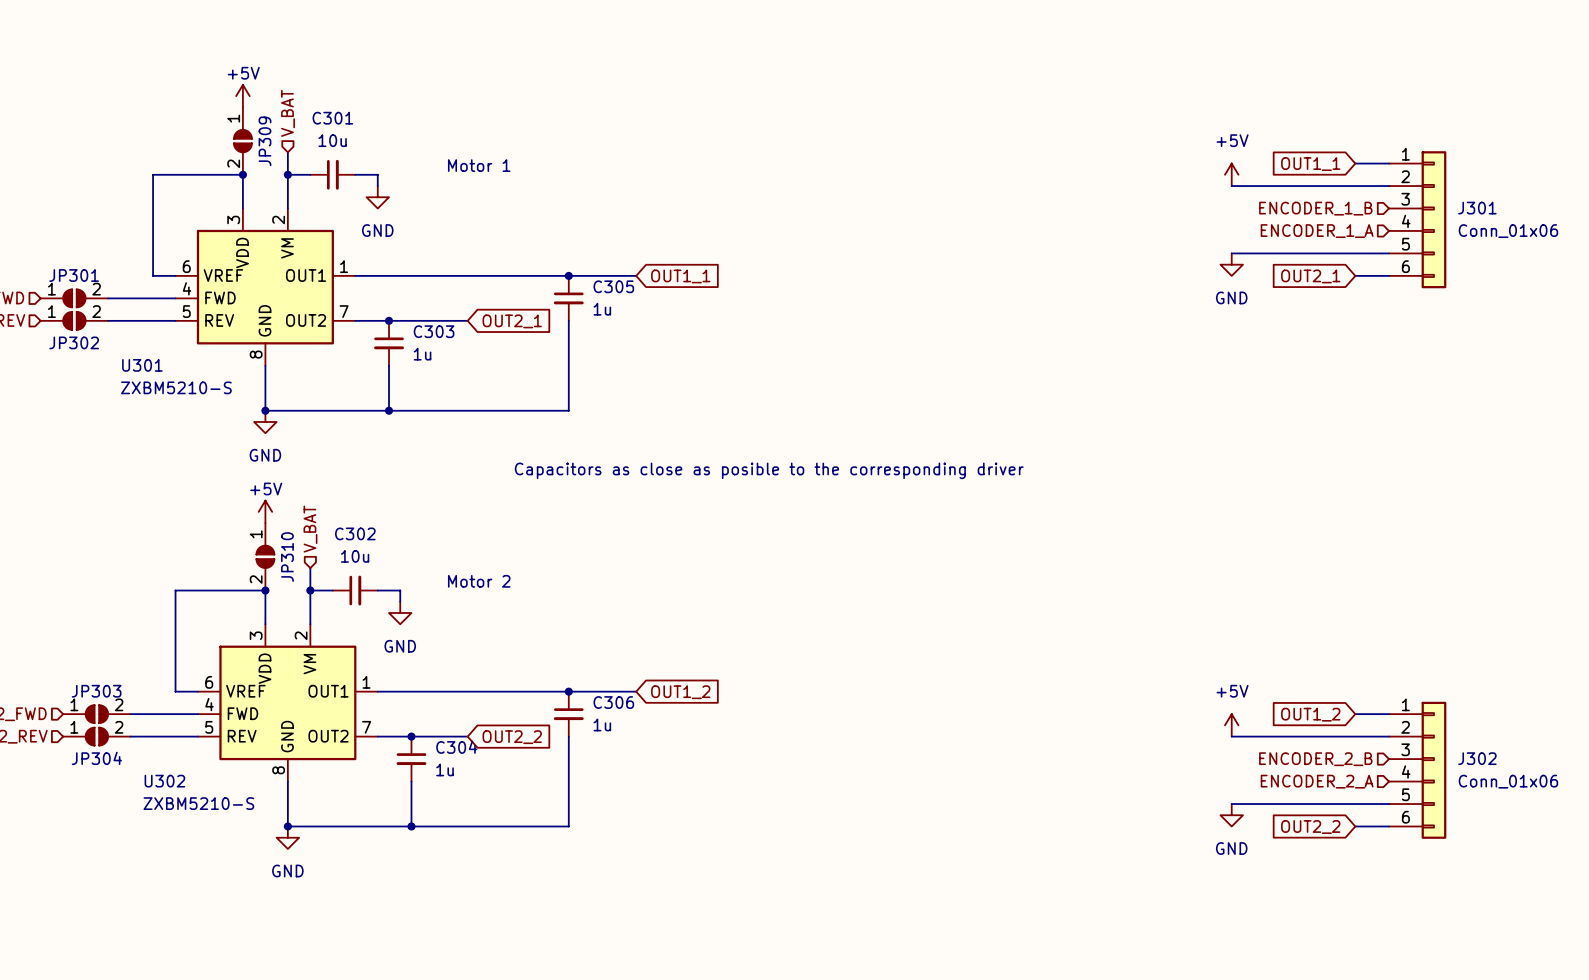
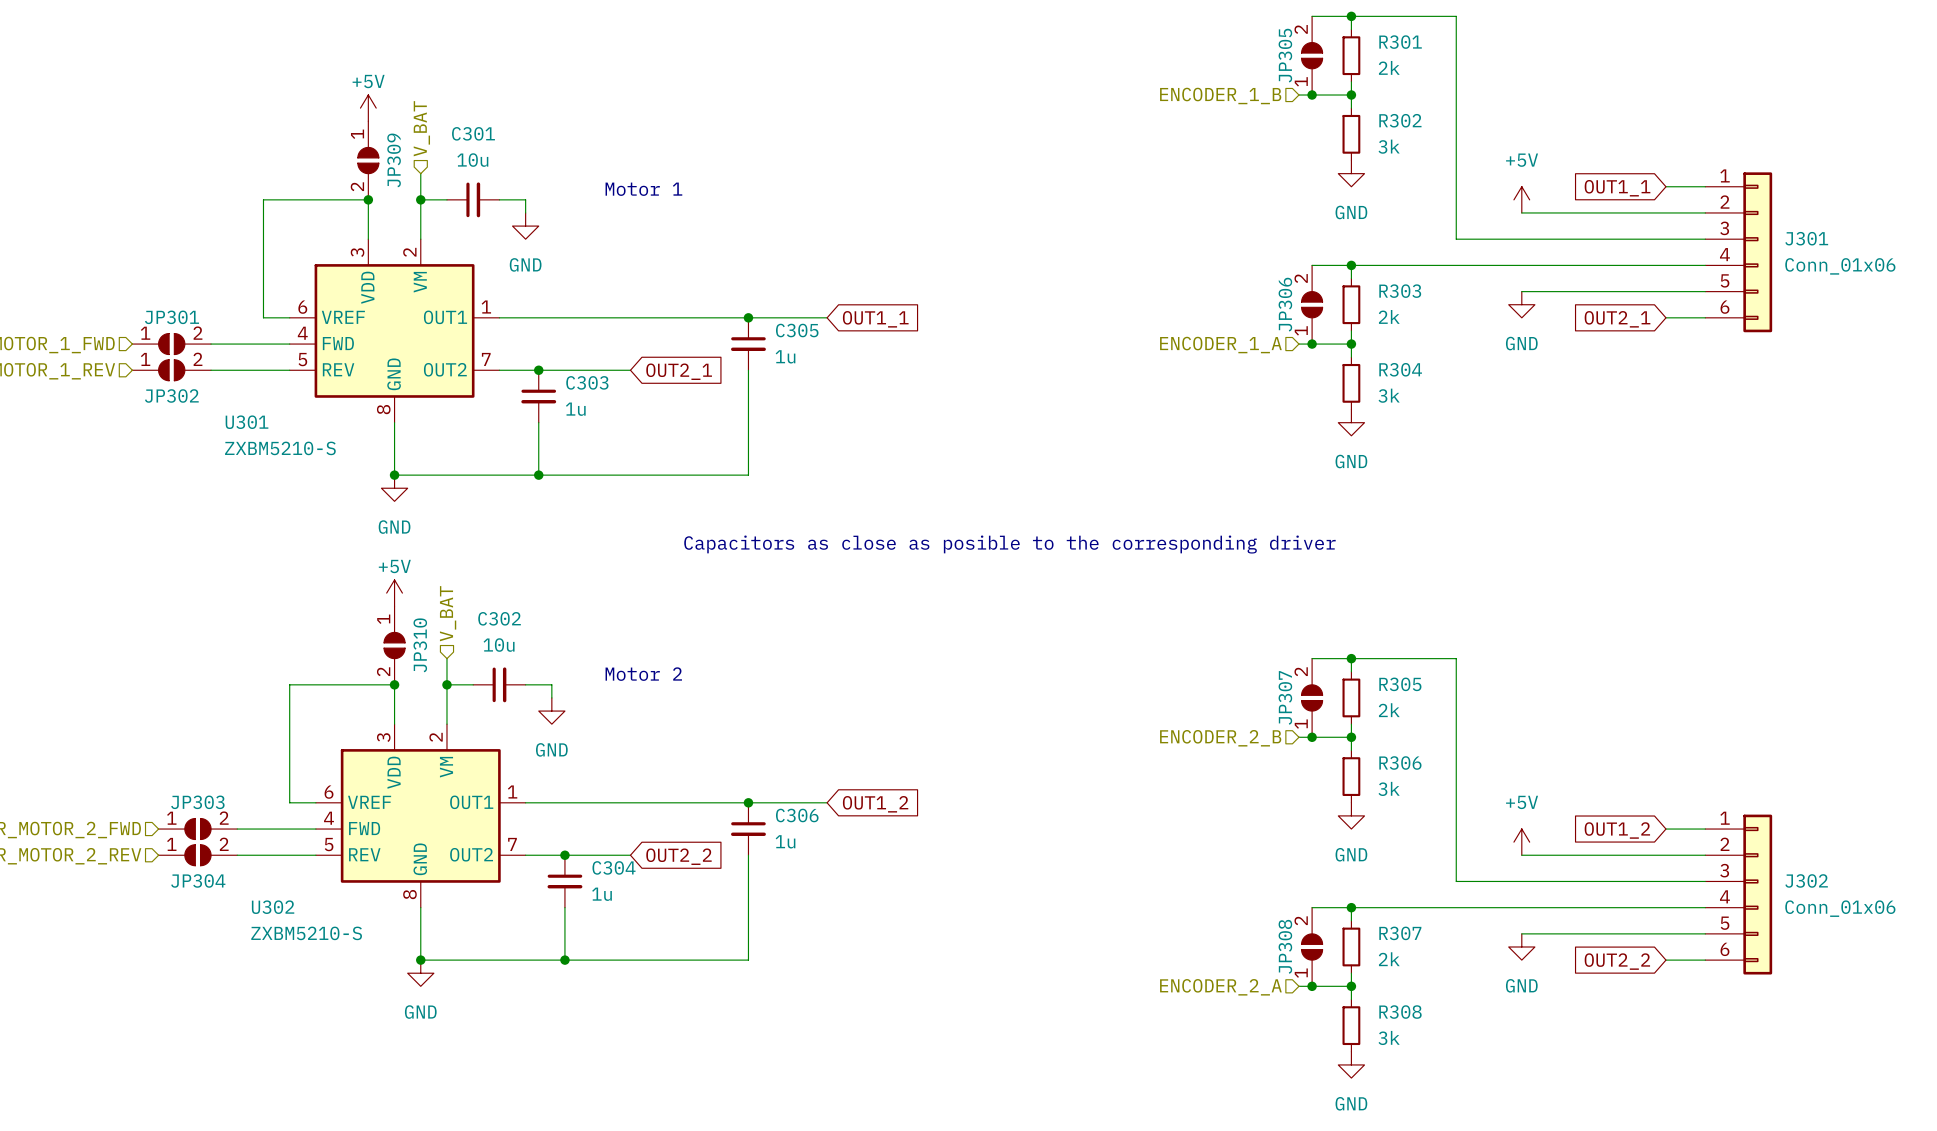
wire: none -> (1312, 16) (1456, 16) (1456, 239) (1705, 239)
wire: none -> (1351, 16) (1351, 29)
junction: none -> (1351, 16)
JP305: none -> (1312, 55)
R301: none -> 2k (1351, 55)
wire: none -> (1351, 81) (1351, 108)
wire: none -> (1298, 95) (1351, 95)
junction: none -> (1312, 95)
junction: none -> (1351, 95)
hierarchical label: none -> ENCODER_1_B (1220, 95)
R302: none -> 3k (1351, 134)
power symbol: none -> GND (1351, 173)
hierarchical label: ENCODER_1_B (1315, 208) -> none
wire: none -> (1312, 265) (1705, 265)
wire: none -> (1351, 265) (1351, 278)
junction: none -> (1351, 265)
hierarchical label: ENCODER_1_A (1317, 231) -> none
JP306: none -> (1312, 304)
R303: none -> 2k (1351, 304)
wire: none -> (1351, 330) (1351, 357)
hierarchical label: none -> ENCODER_1_A (1220, 345)
wire: none -> (1298, 344) (1351, 344)
junction: none -> (1312, 344)
junction: none -> (1351, 344)
R304: none -> 3k (1351, 383)
power symbol: none -> GND (1351, 422)
wire: none -> (1312, 658) (1456, 658) (1456, 881) (1705, 881)
wire: none -> (1351, 658) (1351, 671)
junction: none -> (1351, 658)
JP307: none -> (1312, 697)
R305: none -> 2k (1351, 697)
wire: none -> (1351, 724) (1351, 750)
hierarchical label: none -> ENCODER_2_B (1220, 738)
wire: none -> (1298, 737) (1351, 737)
junction: none -> (1312, 737)
junction: none -> (1351, 737)
R306: none -> 3k (1351, 776)
power symbol: none -> GND (1351, 815)
hierarchical label: ENCODER_2_B (1315, 759) -> none
wire: none -> (1312, 907) (1705, 907)
wire: none -> (1351, 907) (1351, 920)
junction: none -> (1351, 907)
hierarchical label: ENCODER_2_A (1317, 781) -> none
JP308: none -> (1312, 946)
R307: none -> 2k (1351, 946)
wire: none -> (1351, 973) (1351, 999)
wire: none -> (1298, 986) (1351, 986)
junction: none -> (1312, 986)
junction: none -> (1351, 986)
hierarchical label: none -> ENCODER_2_A (1220, 987)
R308: none -> 3k (1351, 1025)
power symbol: none -> GND (1351, 1064)

